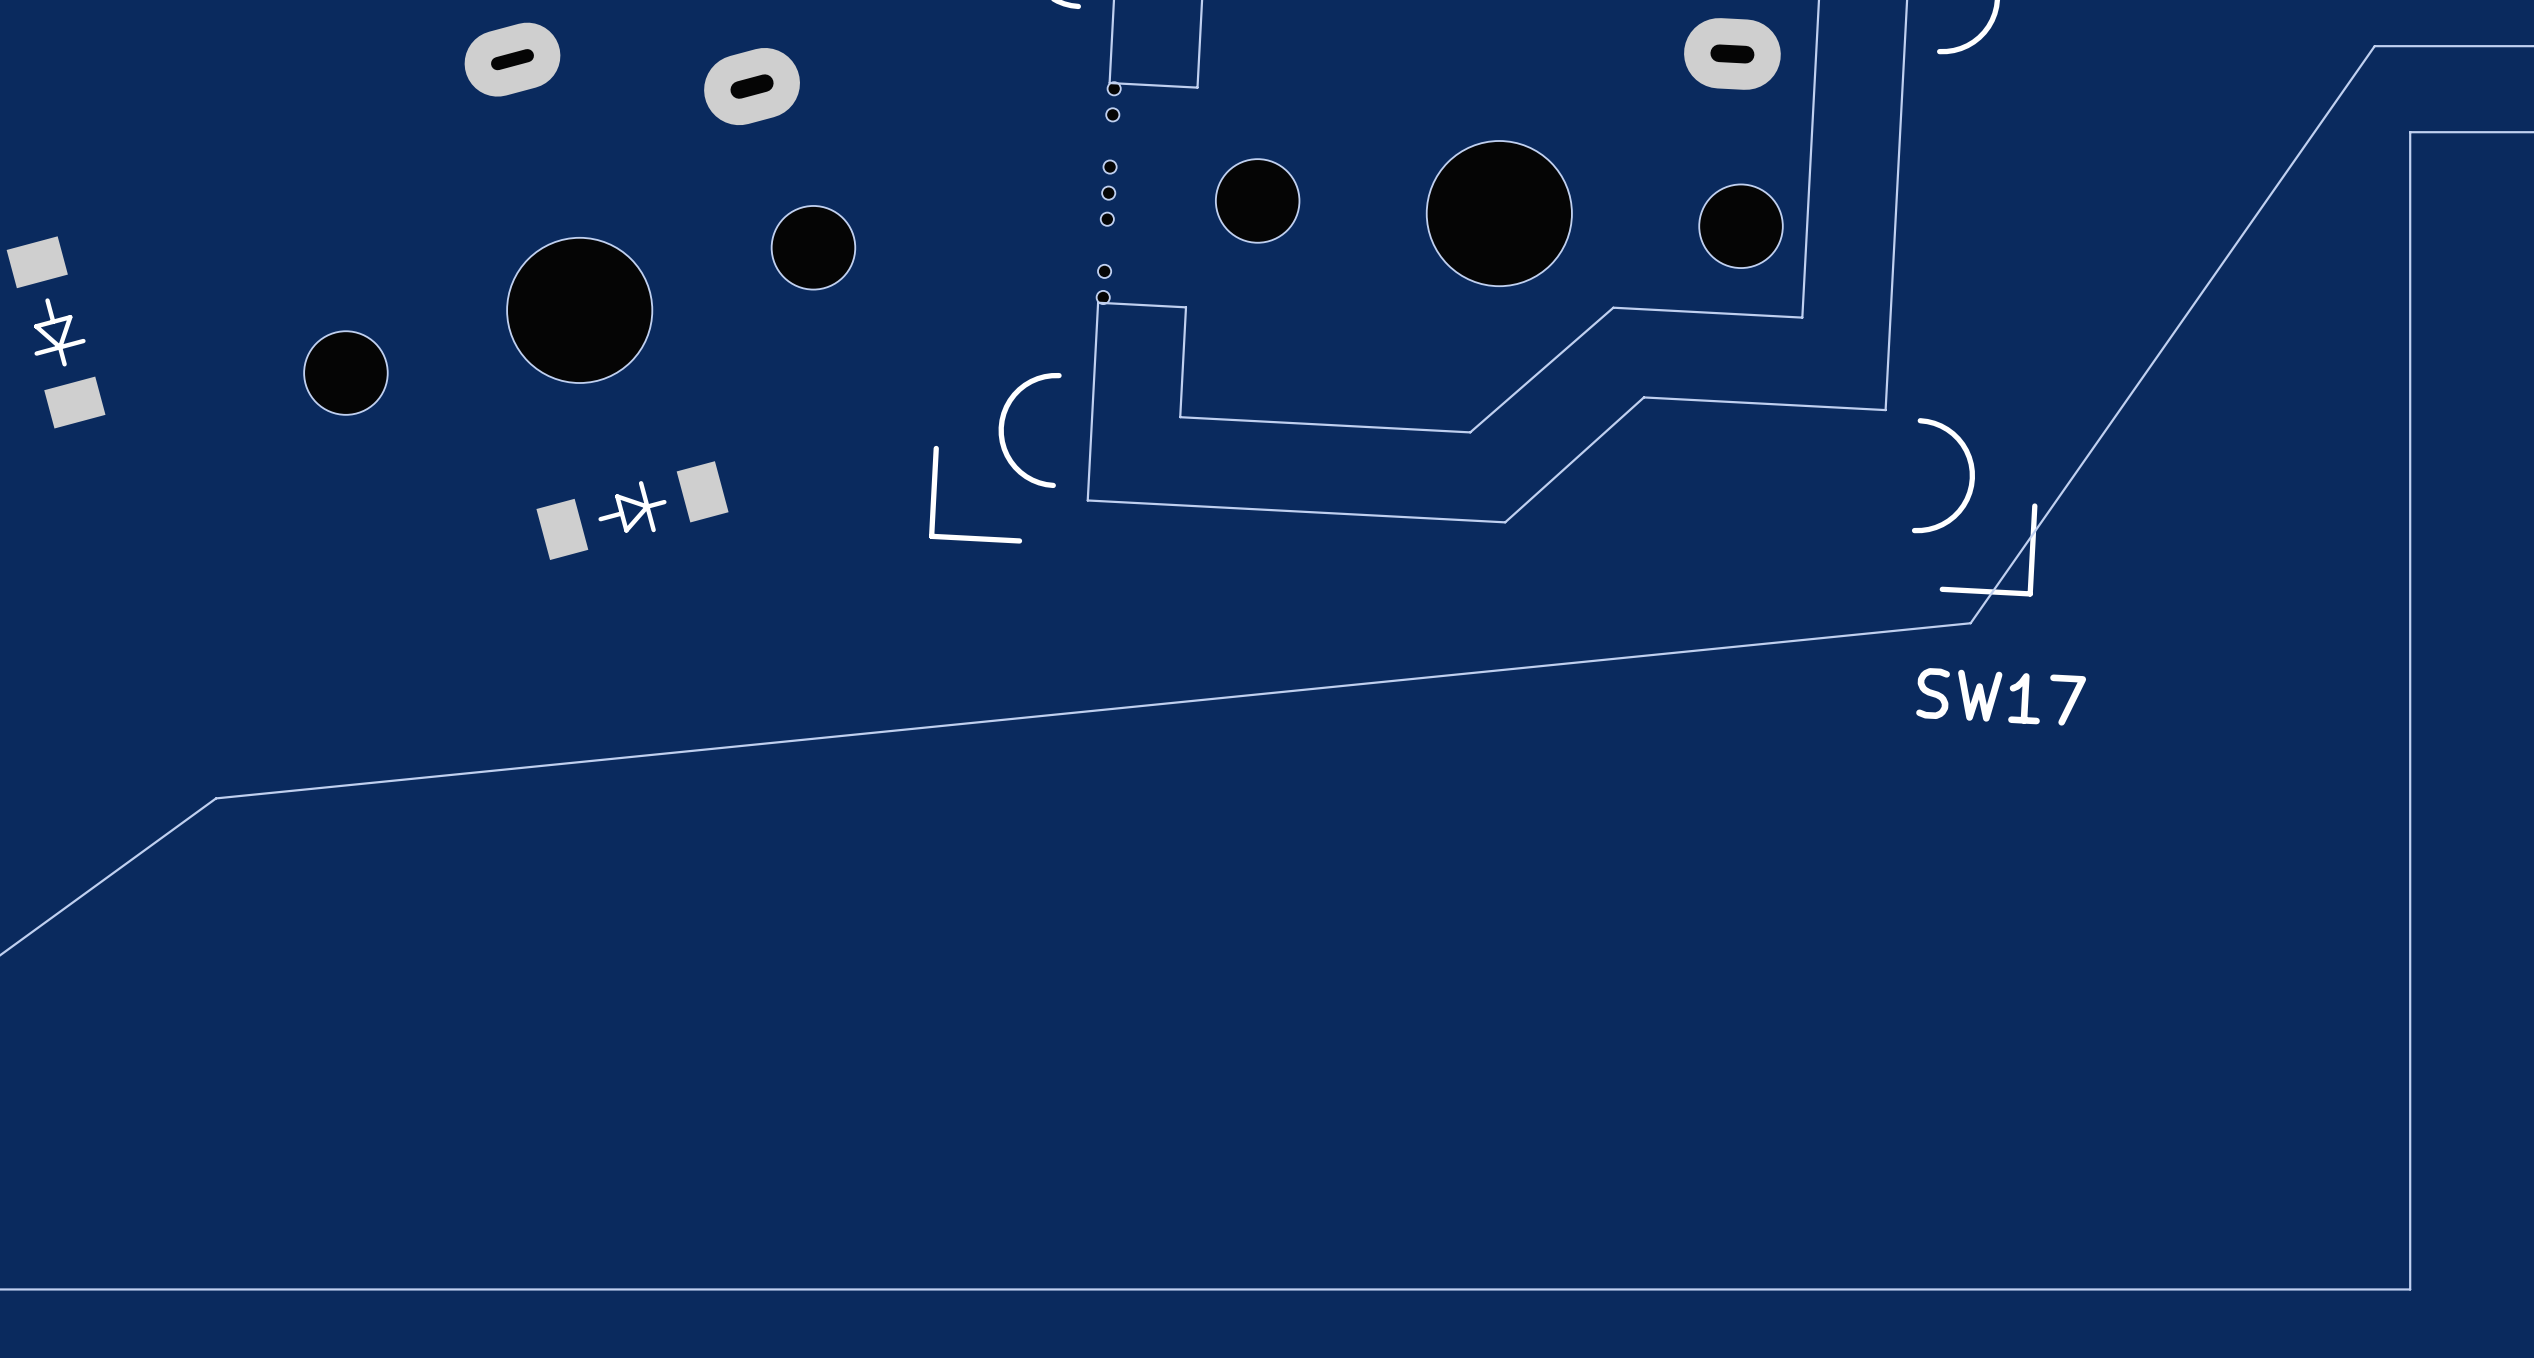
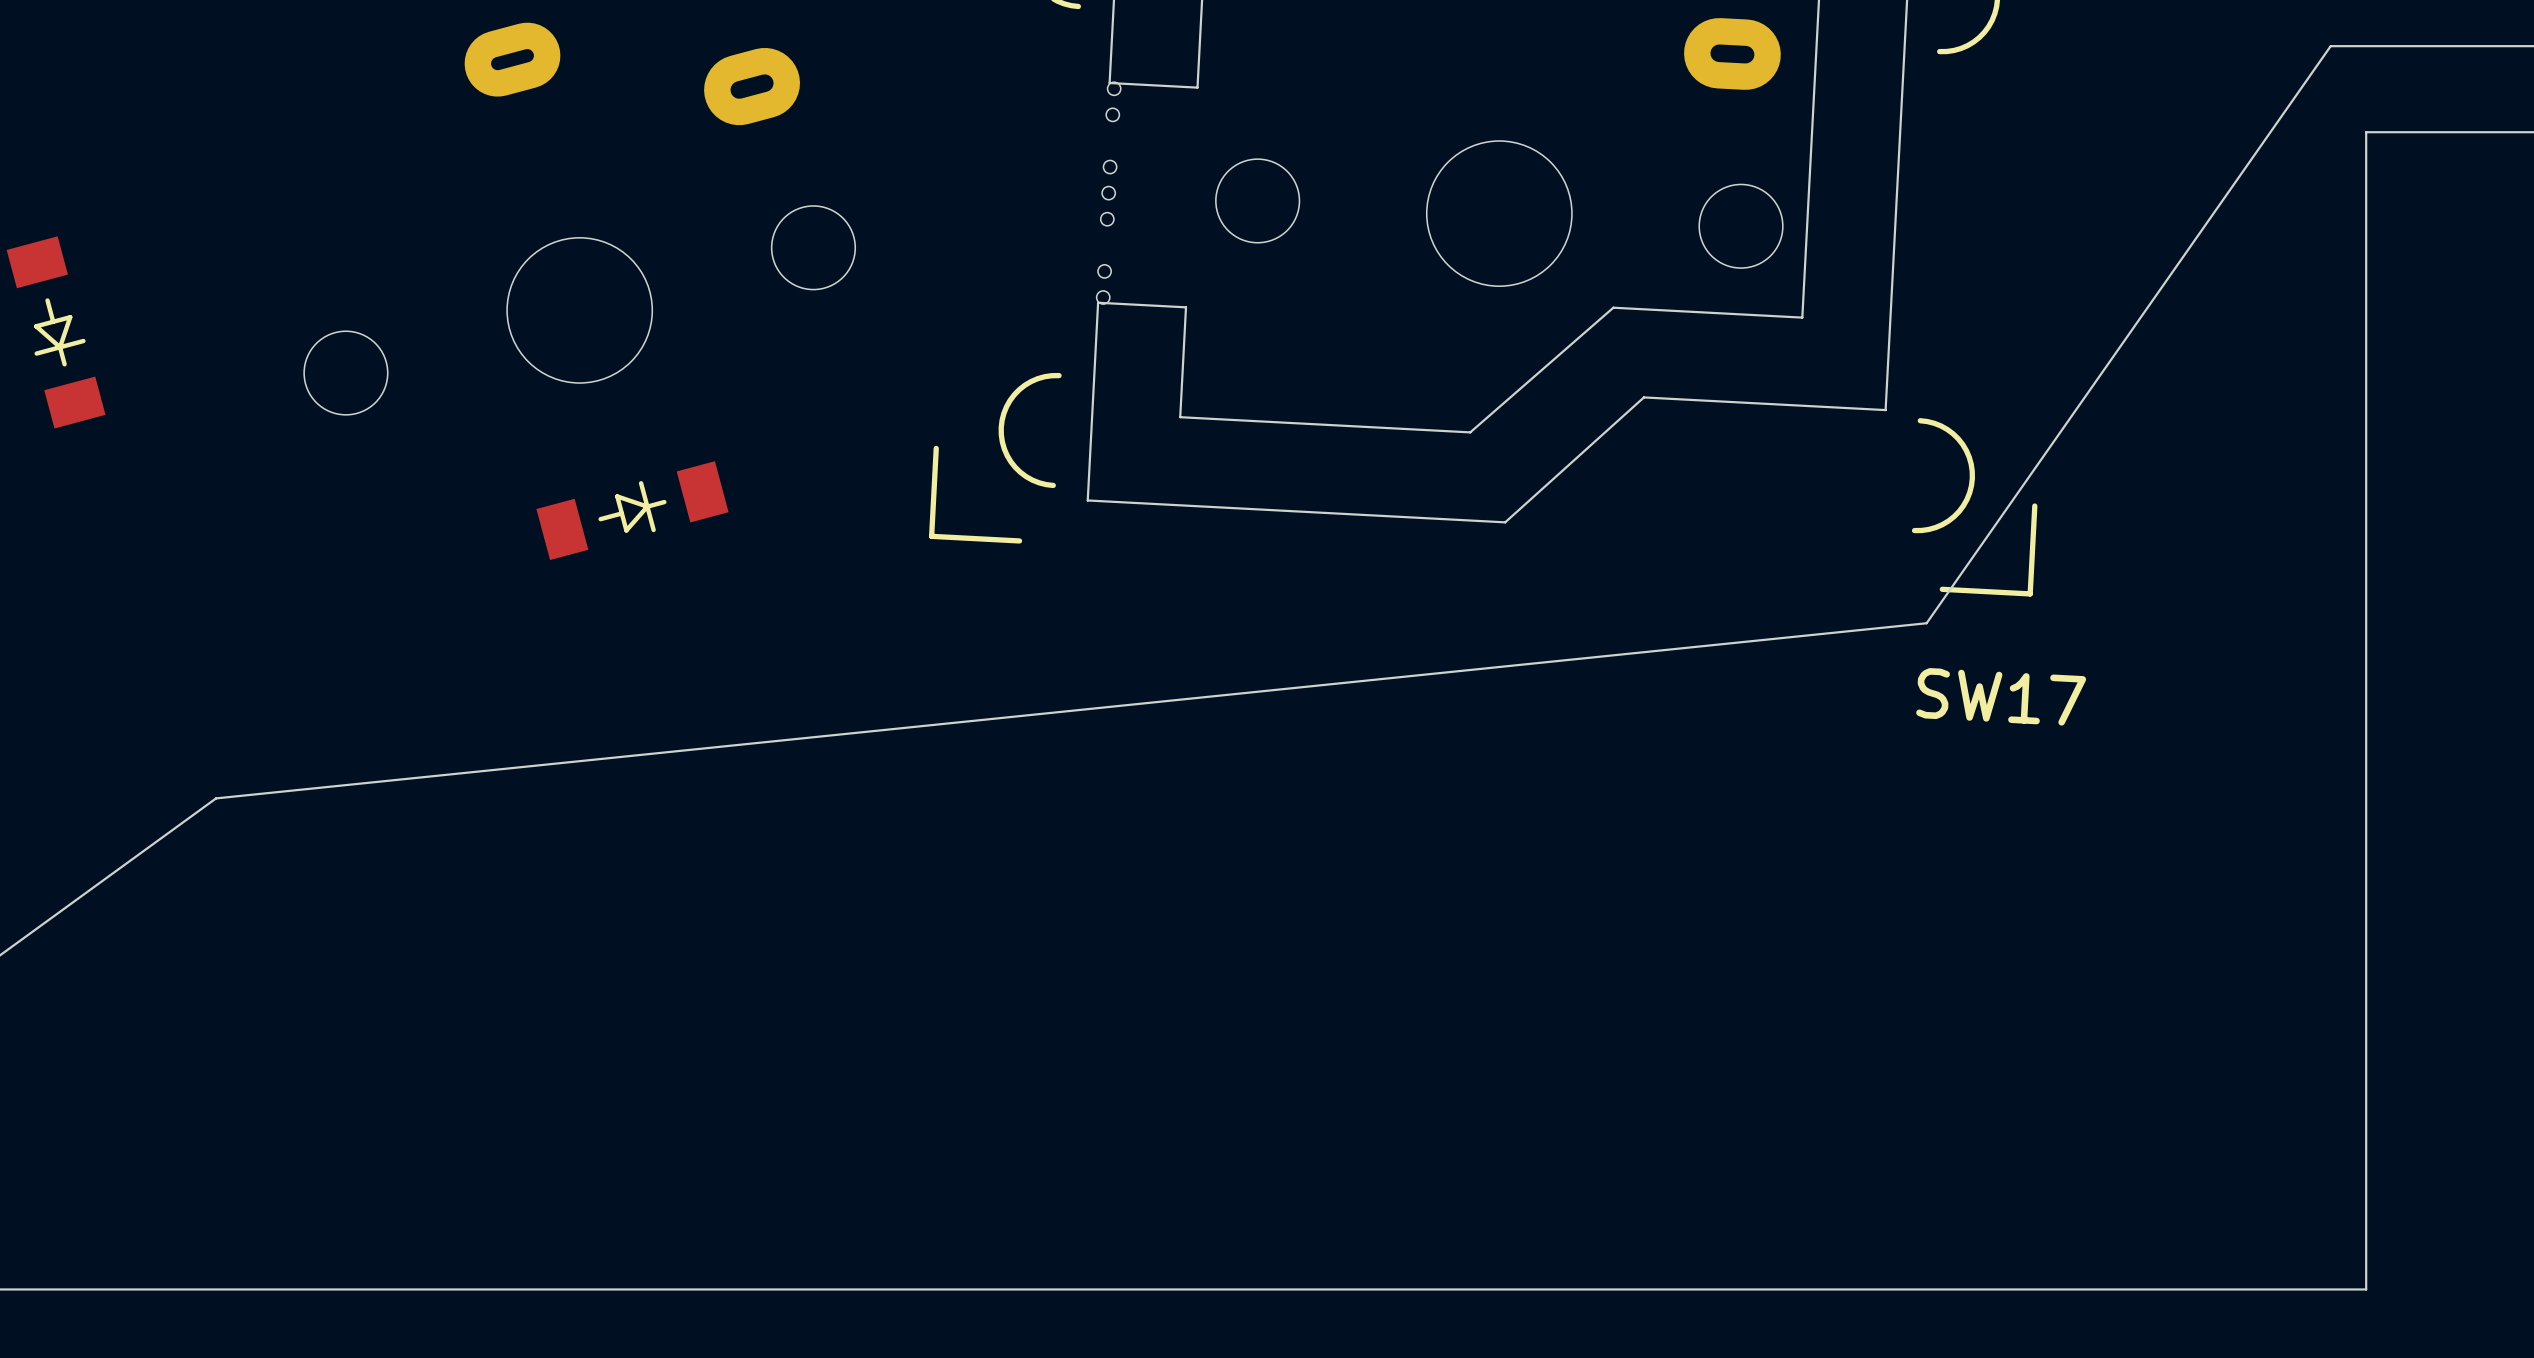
board edge: (2374, 46) (1970, 623) (216, 798) -> (2374, 46) (2330, 46) (1926, 623) (216, 798)
board edge: (2410, 132) (2410, 1289) (2366, 1289) -> (2410, 132) (2366, 132) (2366, 1289)

